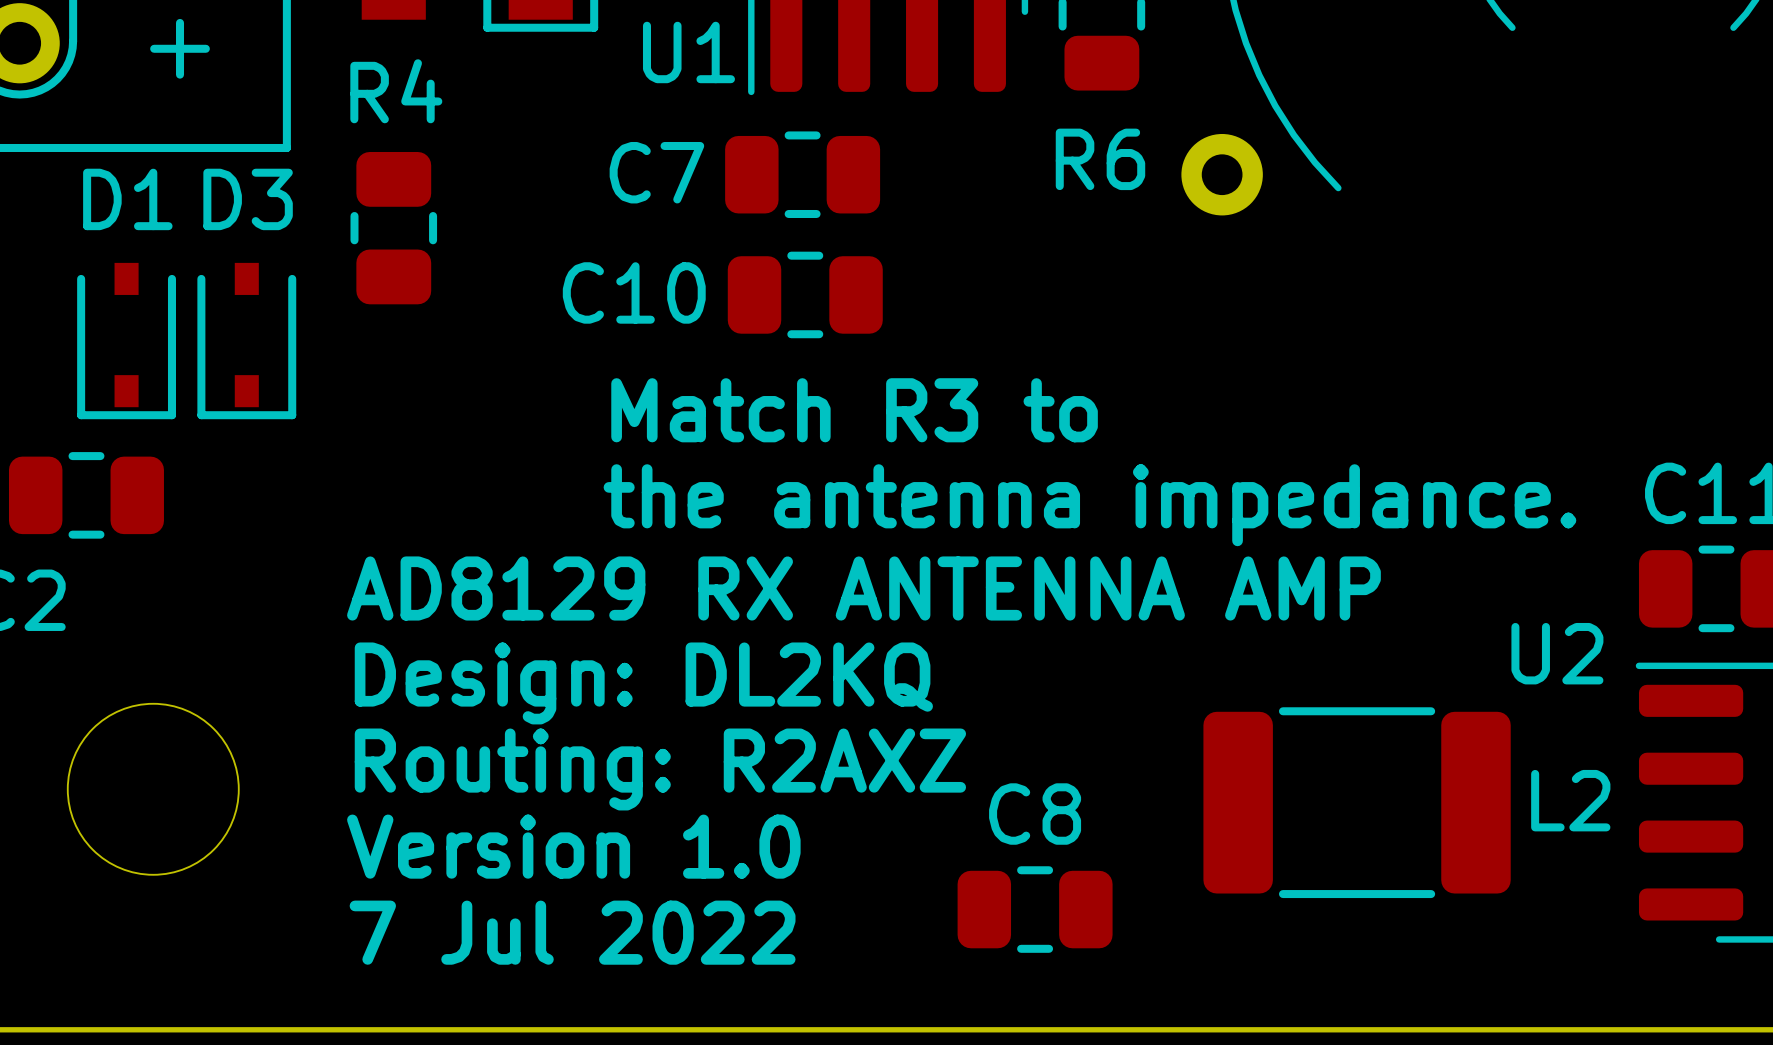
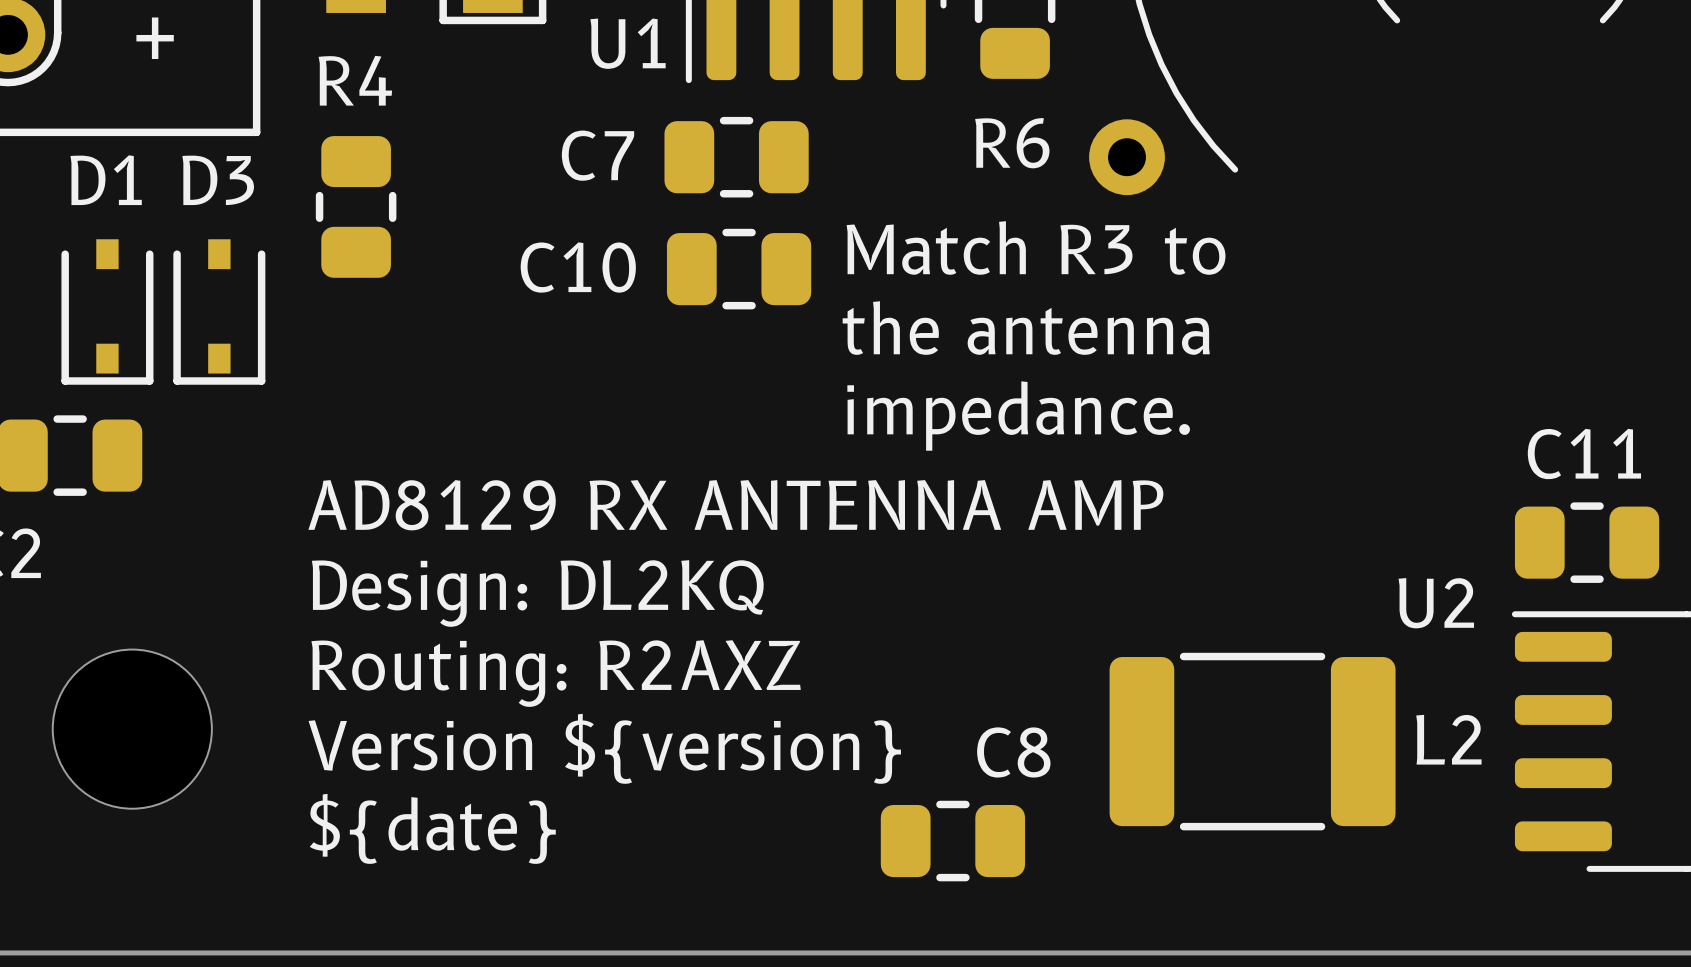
text: none -> the antenna (1026, 328)
text position: Match R3 to (854, 410) -> Match R3 to (1036, 247)
text: the antenna impedance. (1089, 505) -> impedance. (1018, 416)
text position: AD8129 RX ANTENNA AMP (863, 588) -> AD8129 RX ANTENNA AMP (735, 505)
text position: Design: DL2KQ (643, 683) -> Design: DL2KQ (537, 593)
text position: Routing: R2AXZ (660, 769) -> Routing: R2AXZ (556, 673)
text: none -> Version ${version} (604, 748)
C8 name position: C8 (1035, 814) -> C8 (1013, 752)
text: Version 1.0 (573, 846) -> none
text: none -> ${date} (432, 828)
text: 7 Jul 2022 (572, 932) -> none

